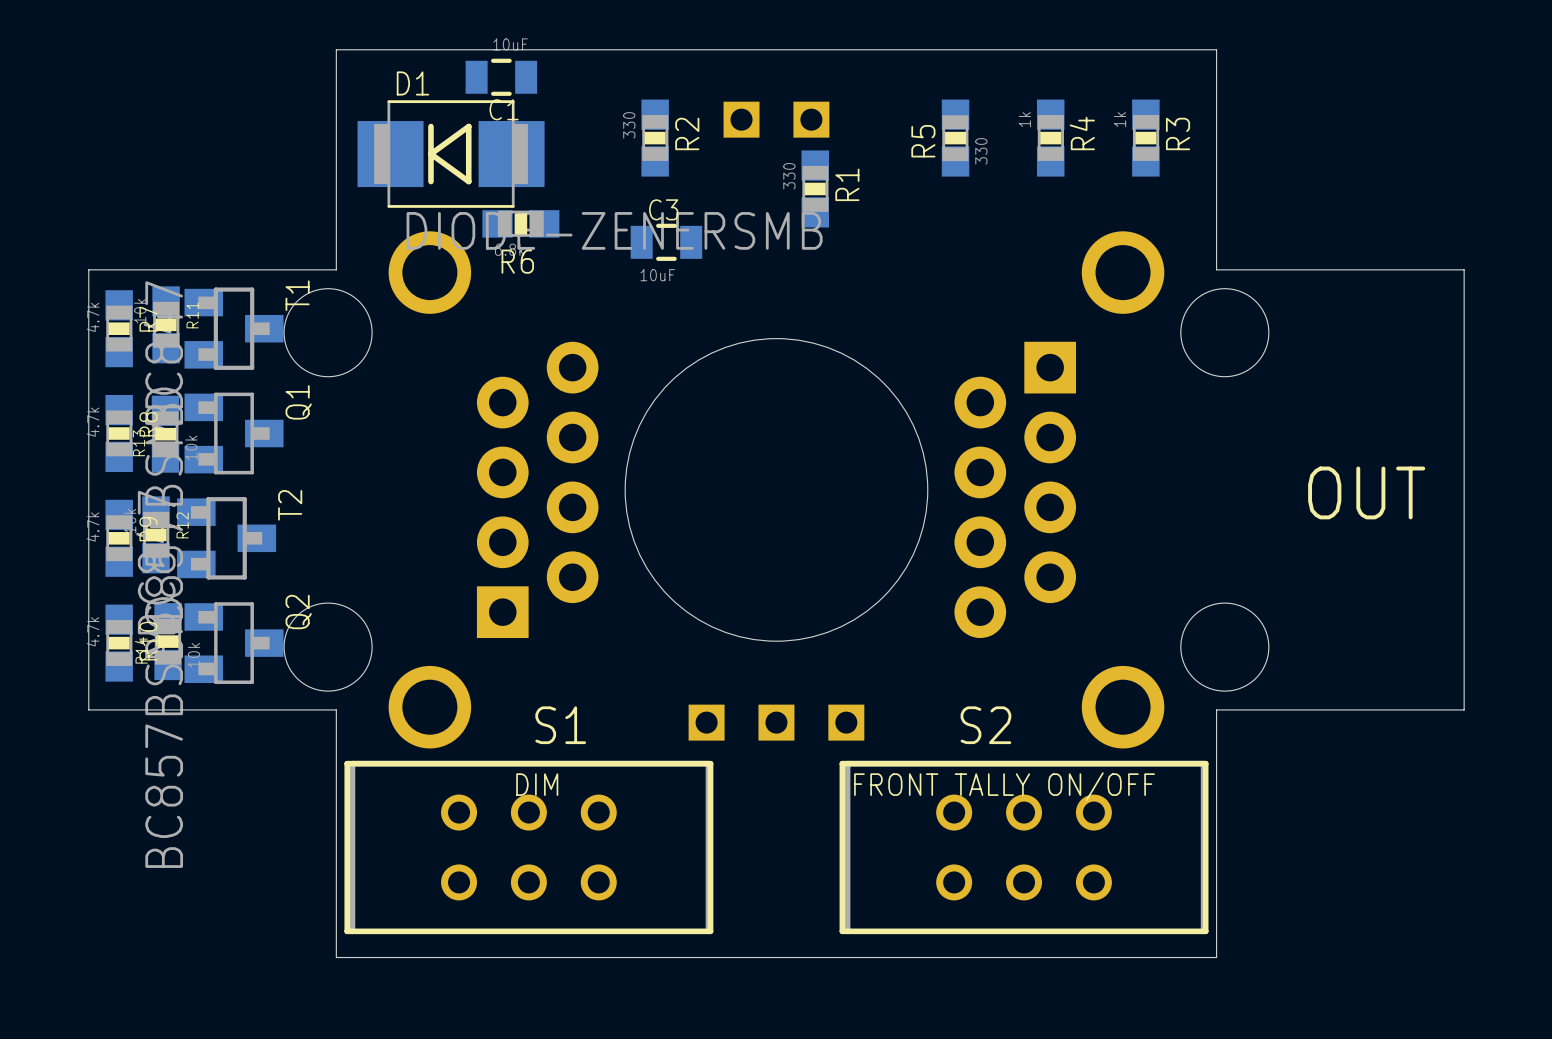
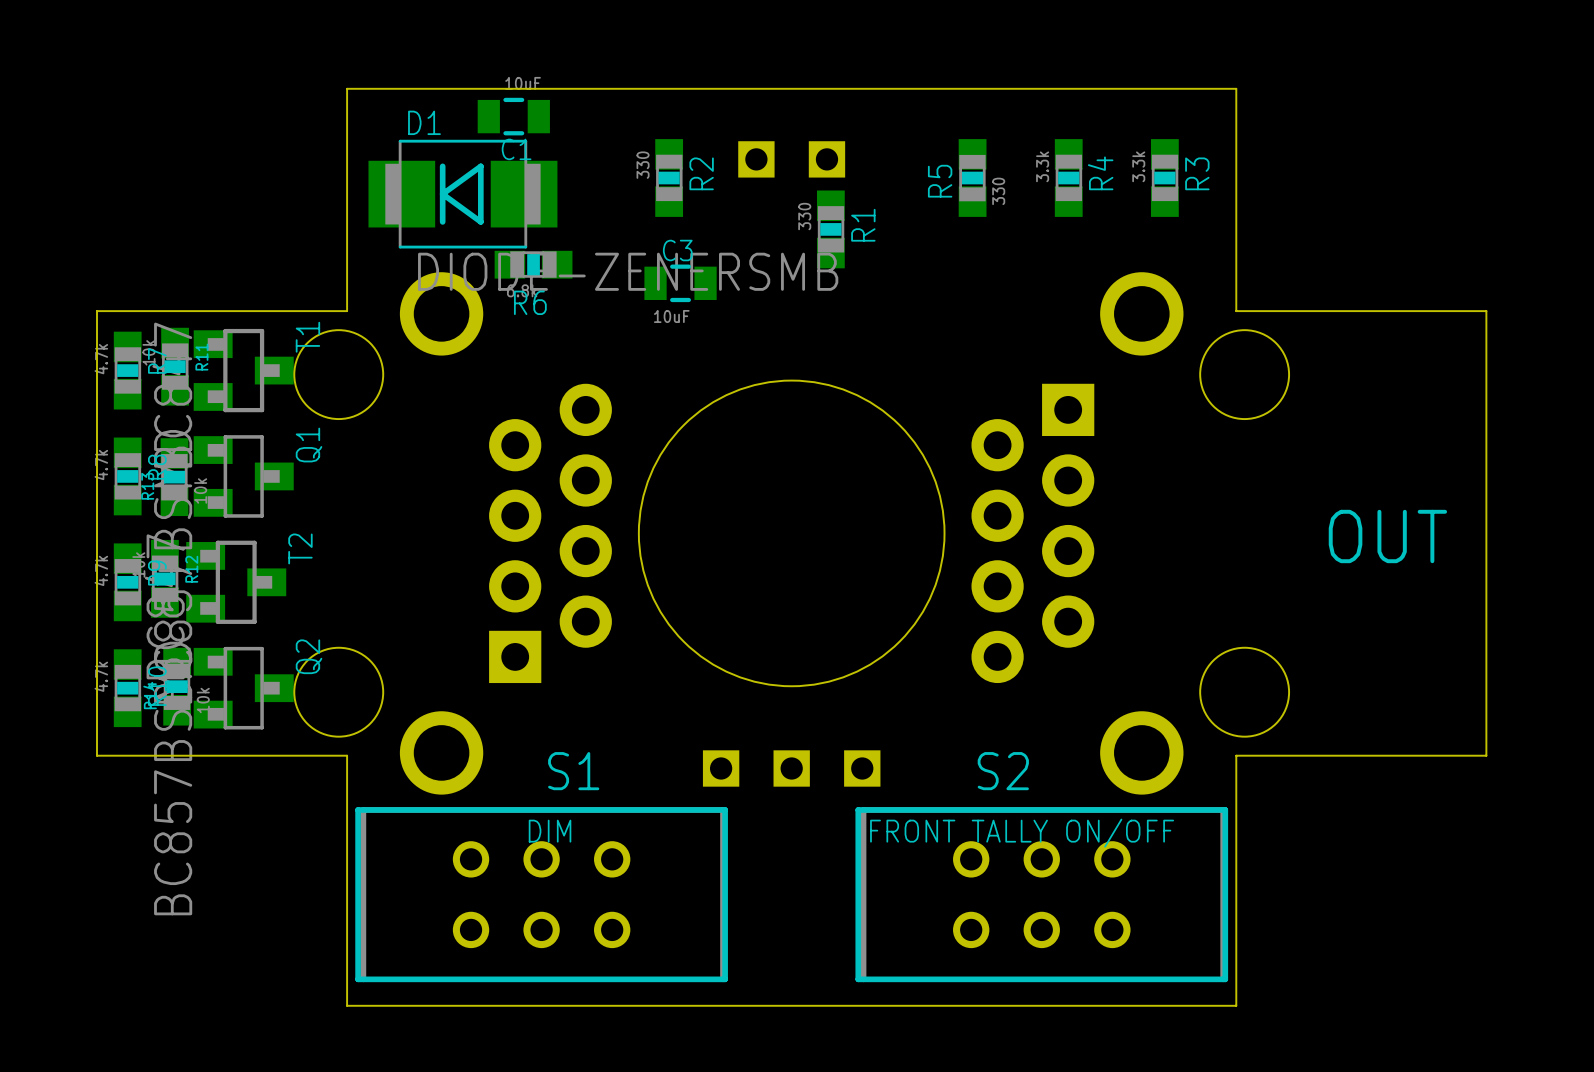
R4 value: 1k (1024, 119) -> 3.3k (1042, 166)
R3 value: 1k (1120, 119) -> 3.3k (1138, 166)

